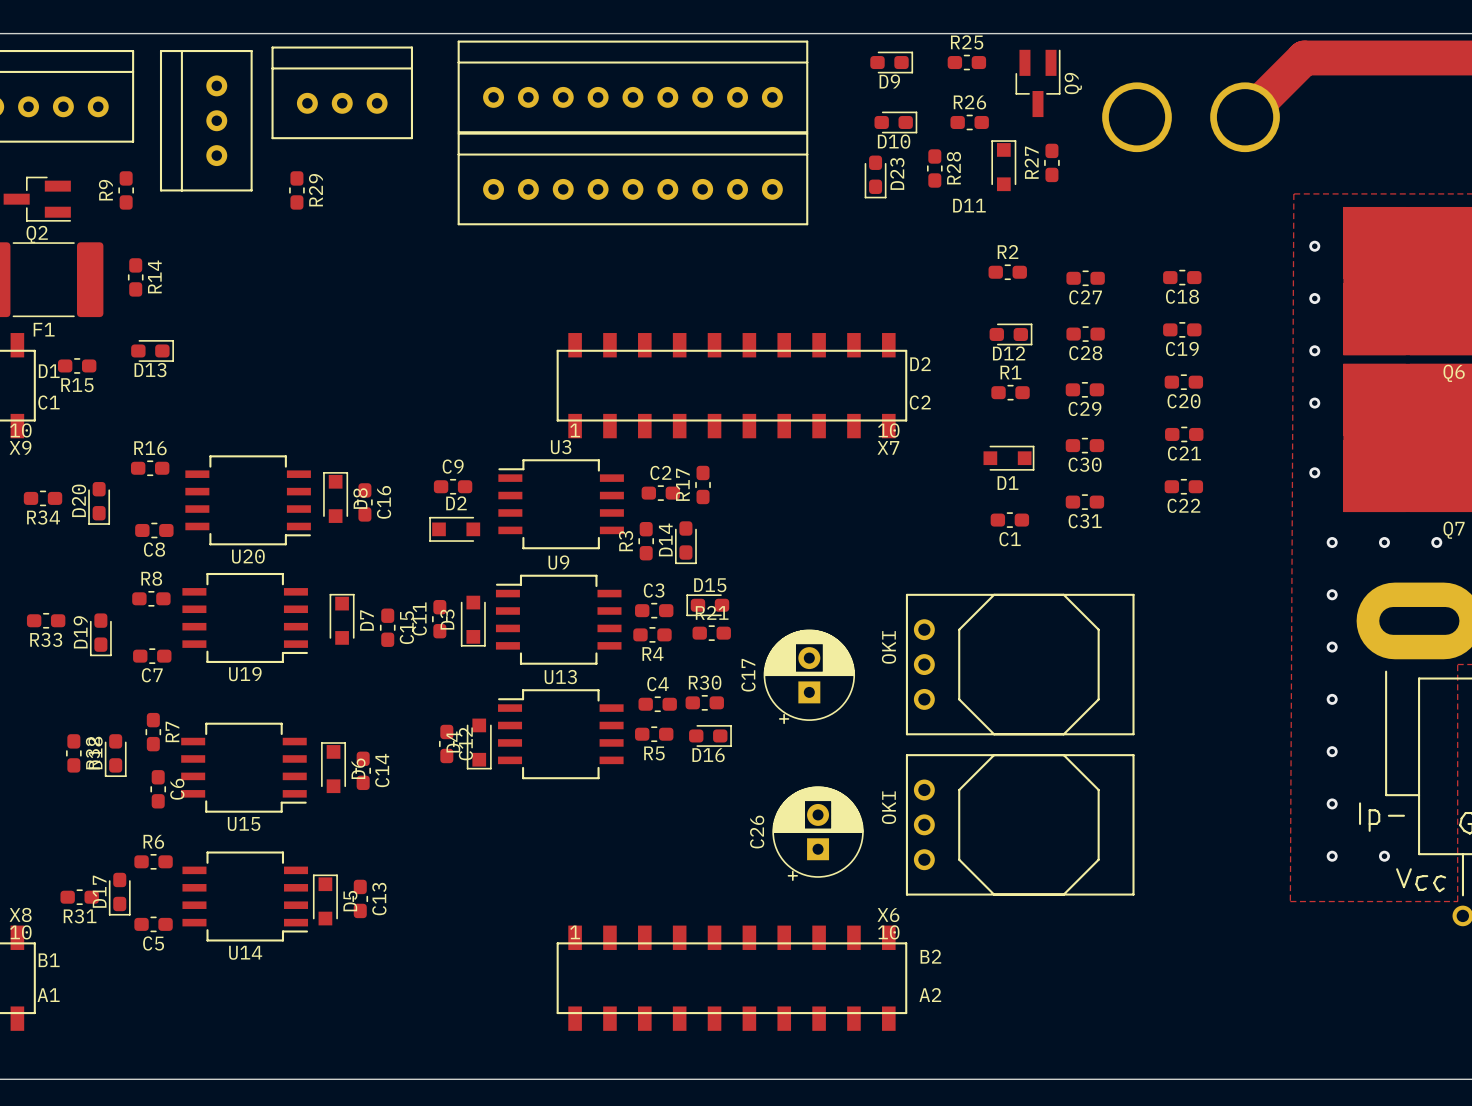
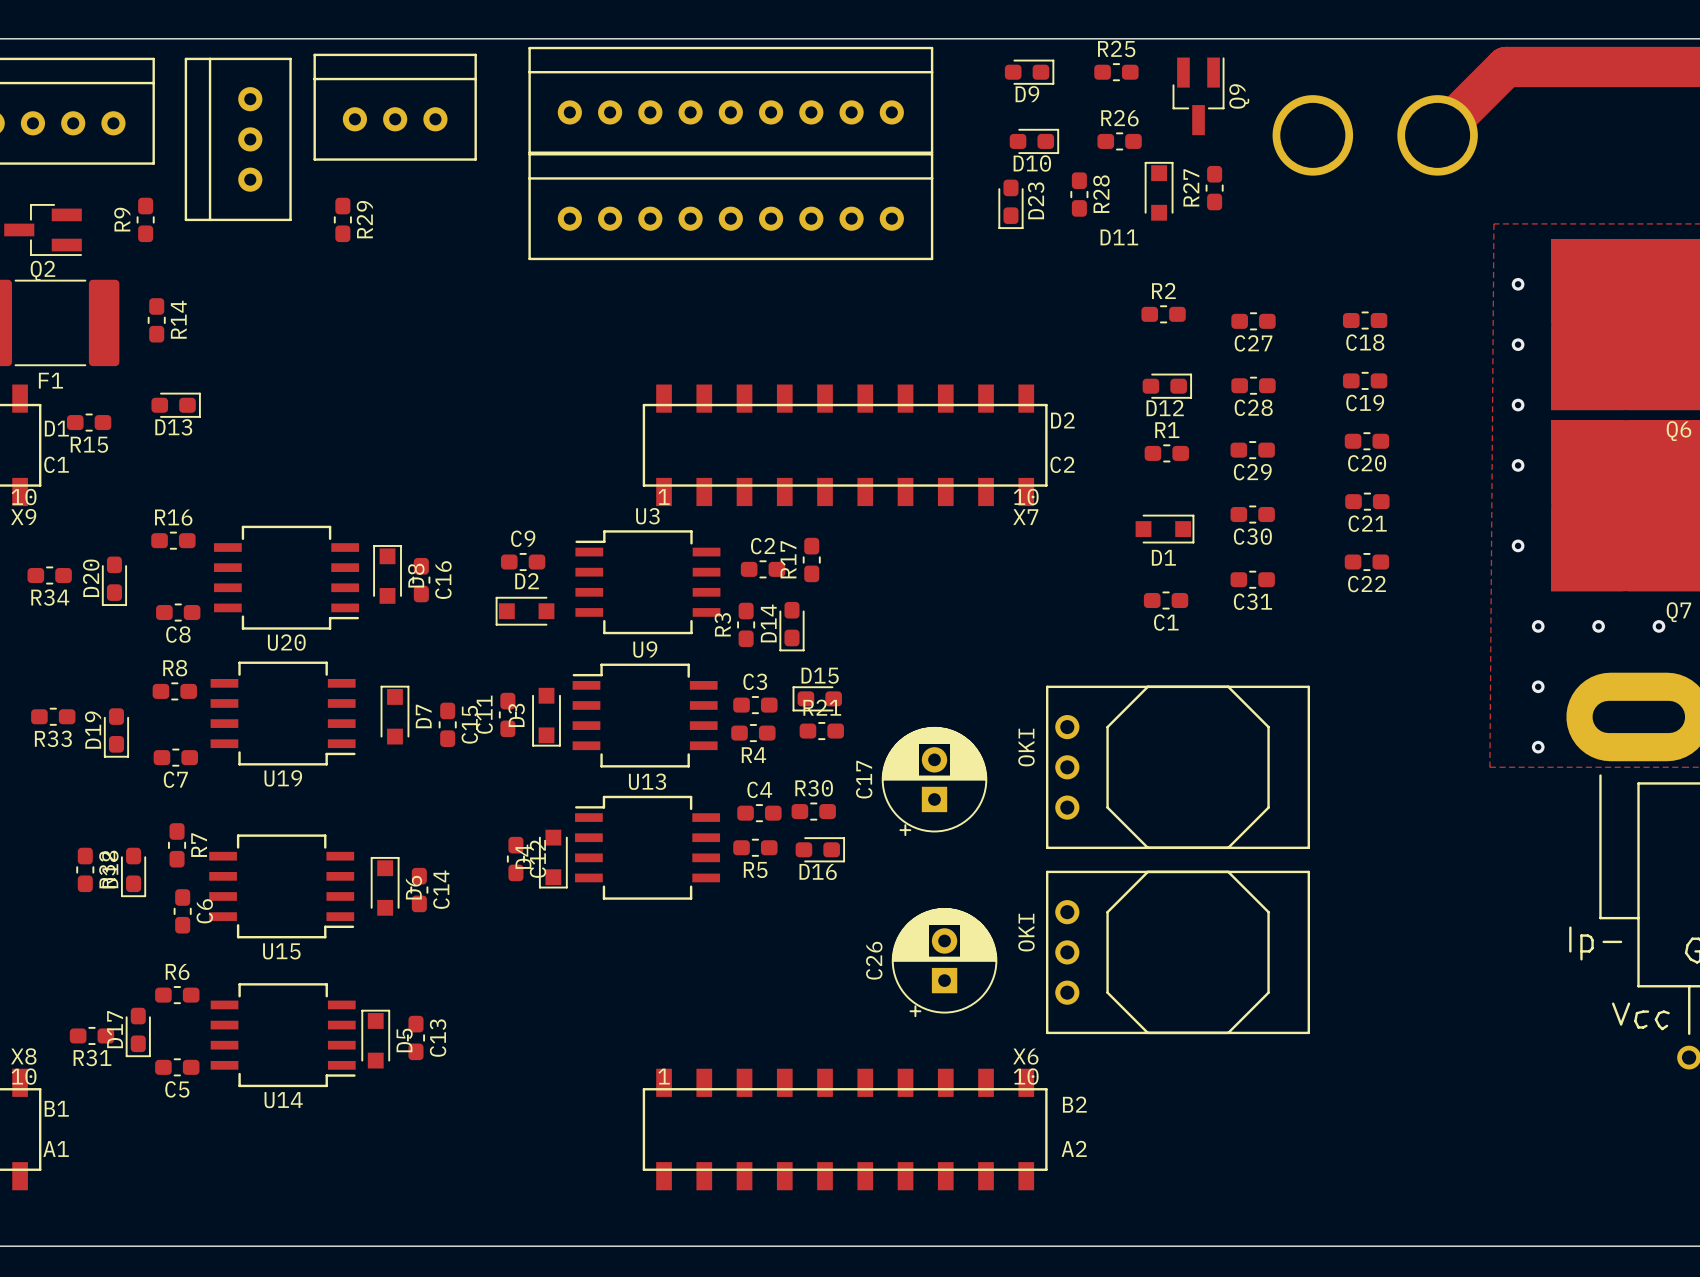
zone outline: (1293, 193) (1290, 901) (1457, 901) (1457, 664) -> (1493, 223) (1489, 767) (1683, 767)
via: (1332, 699) -> none
via: (1332, 751) -> none
via: (1332, 803) -> none
via: (1332, 856) -> none
via: (1384, 856) -> none

